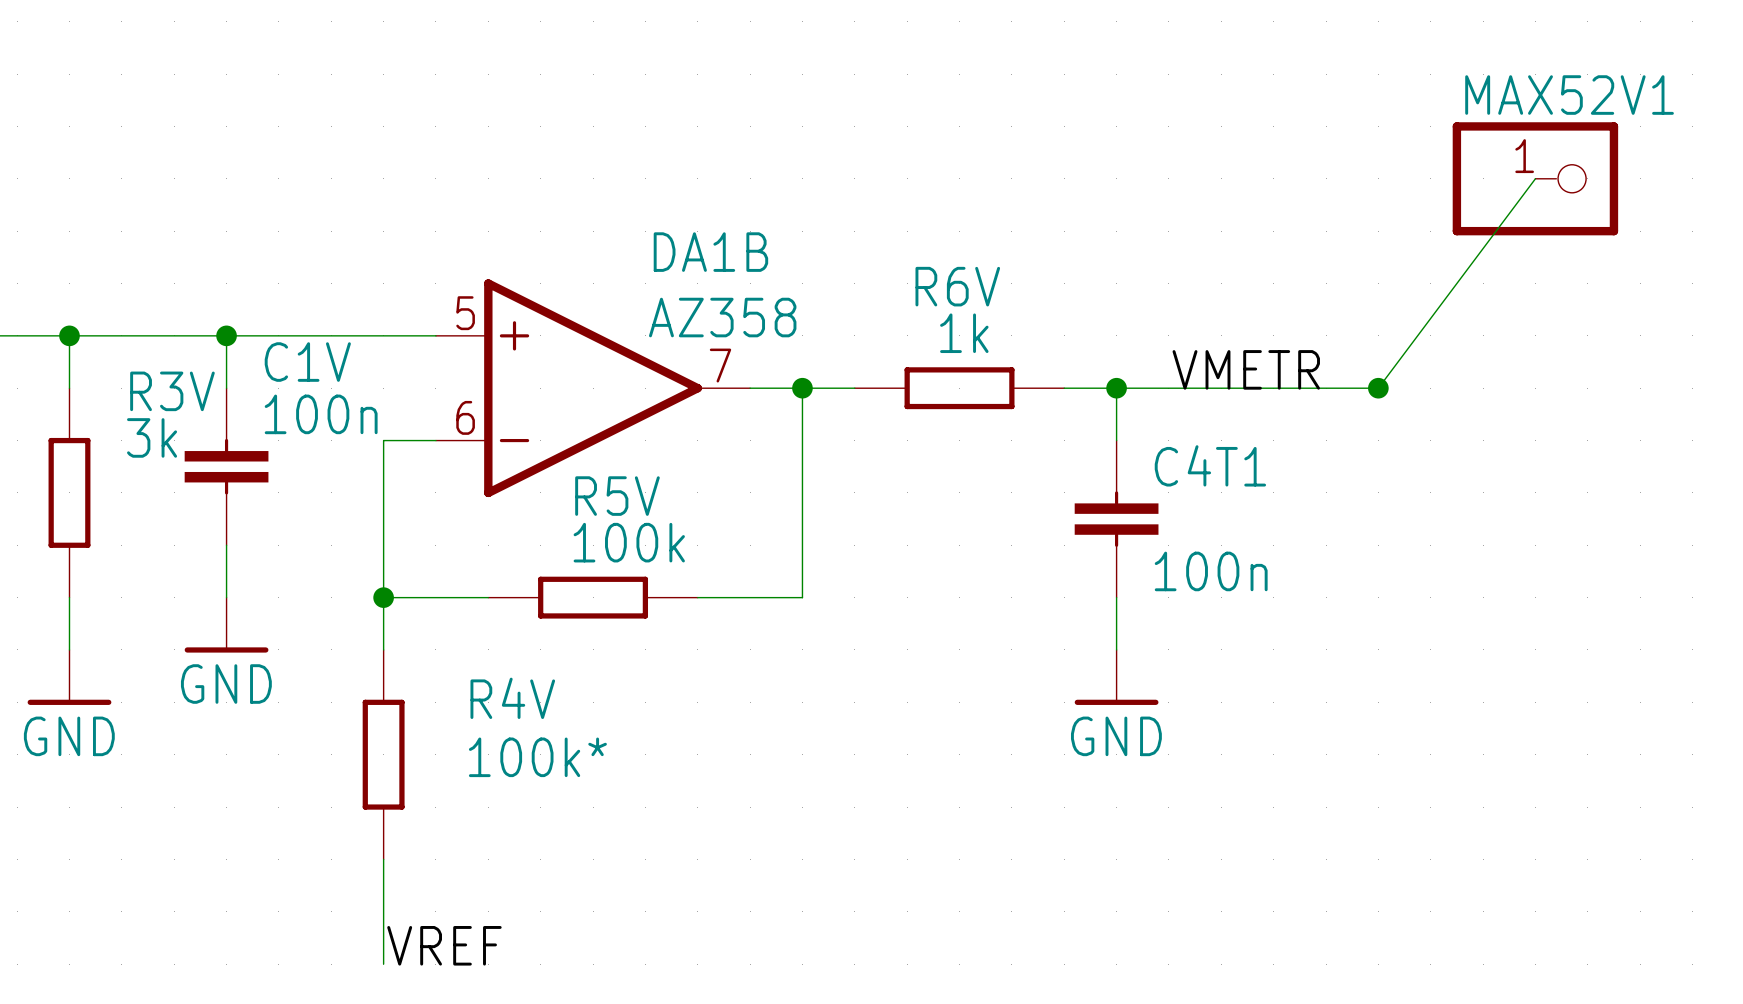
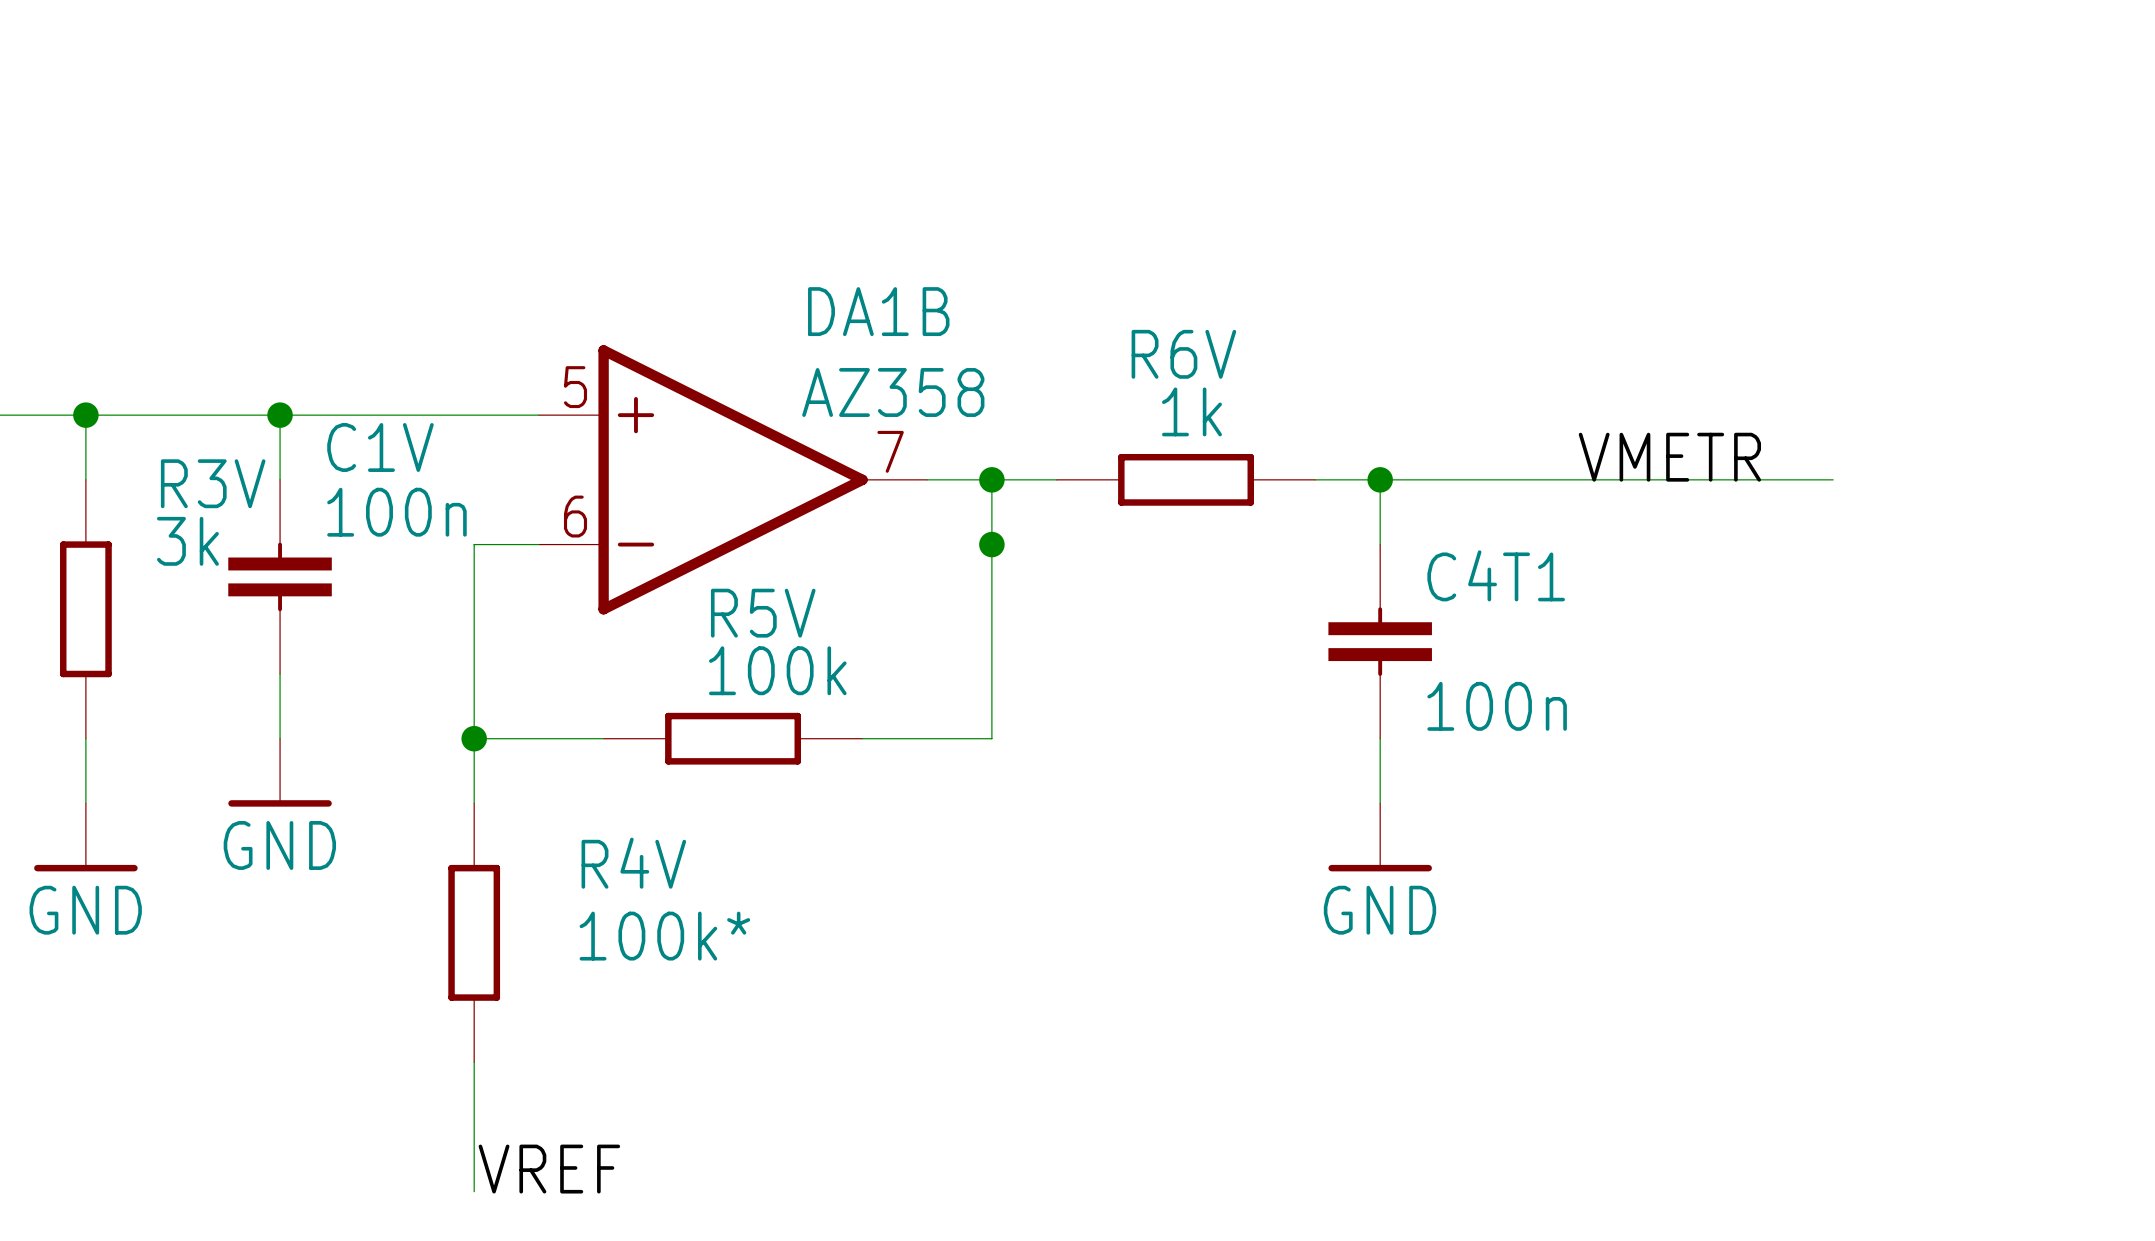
wire: (1535, 178) (1378, 388) -> (1833, 479) (1703, 479)
MAX52V1: (1535, 178) -> none
label position: VMETR (1246, 369) -> VMETR (1669, 457)
junction: (1378, 388) -> none
junction: none -> (991, 544)

